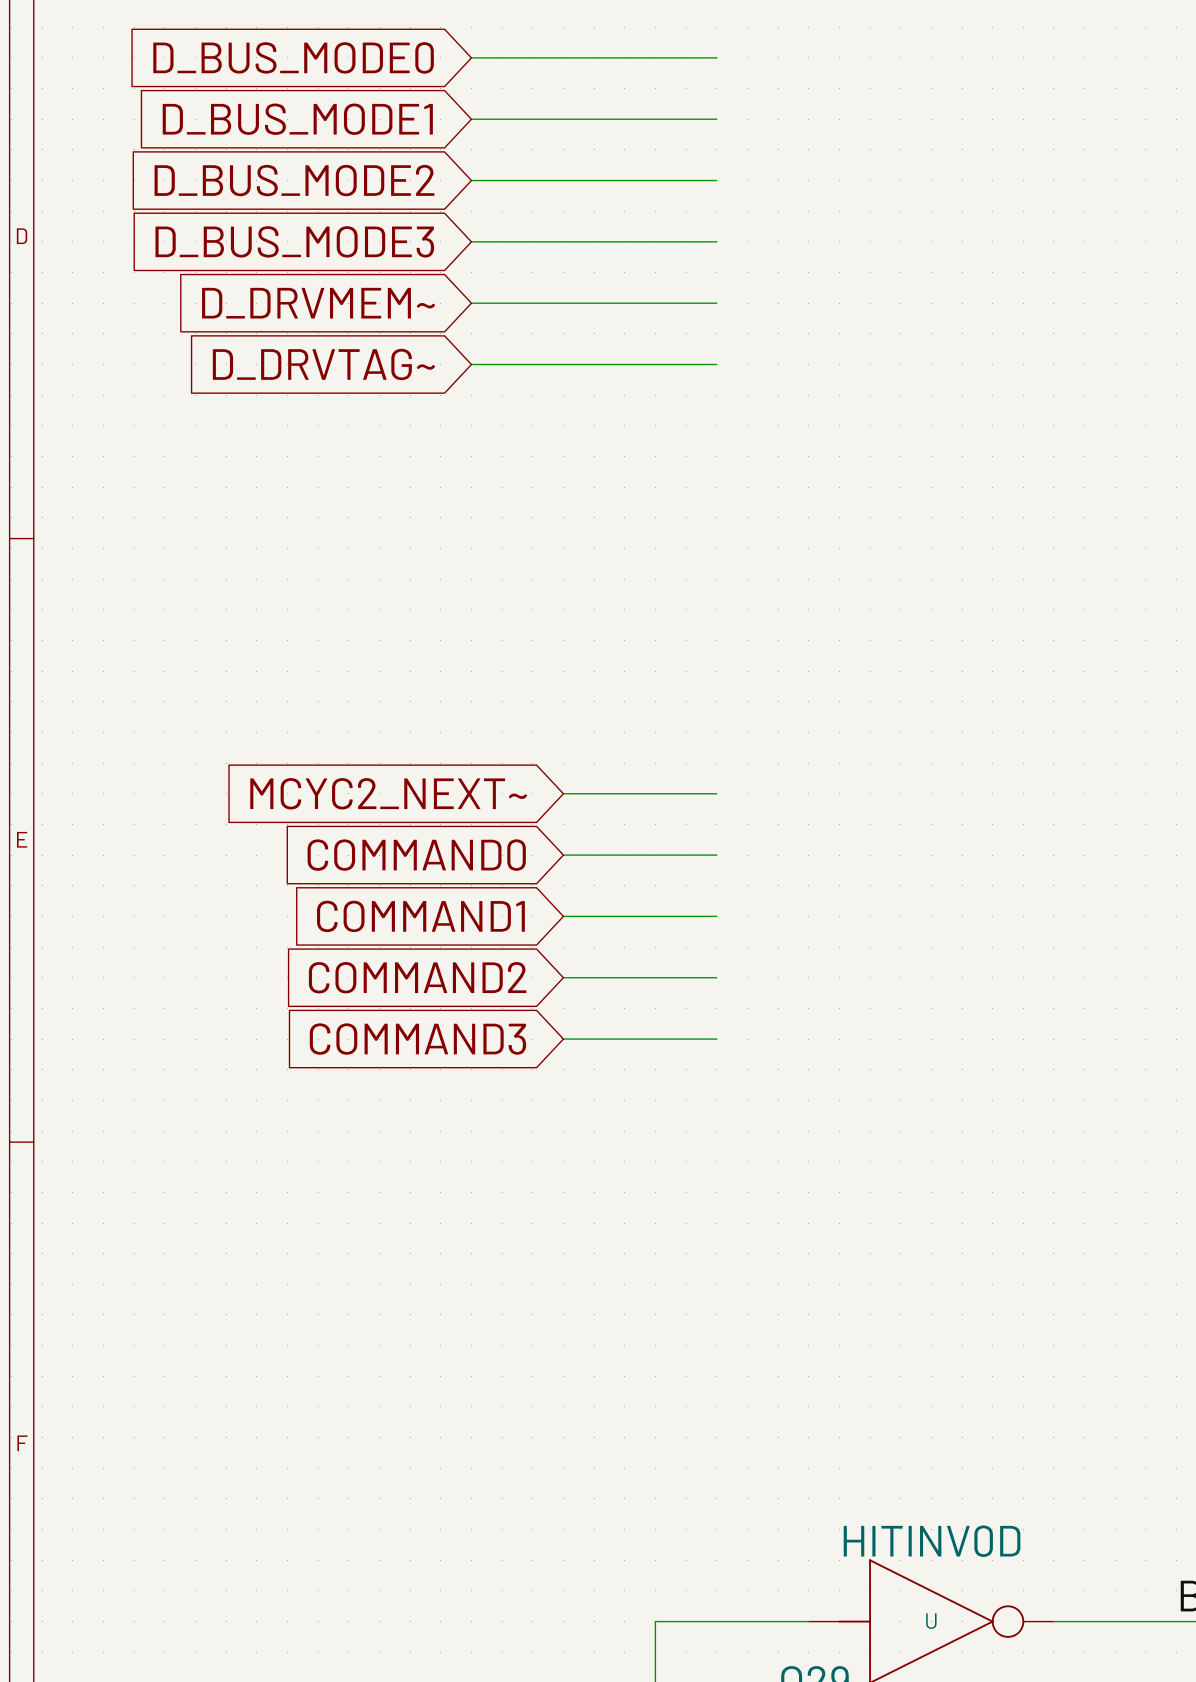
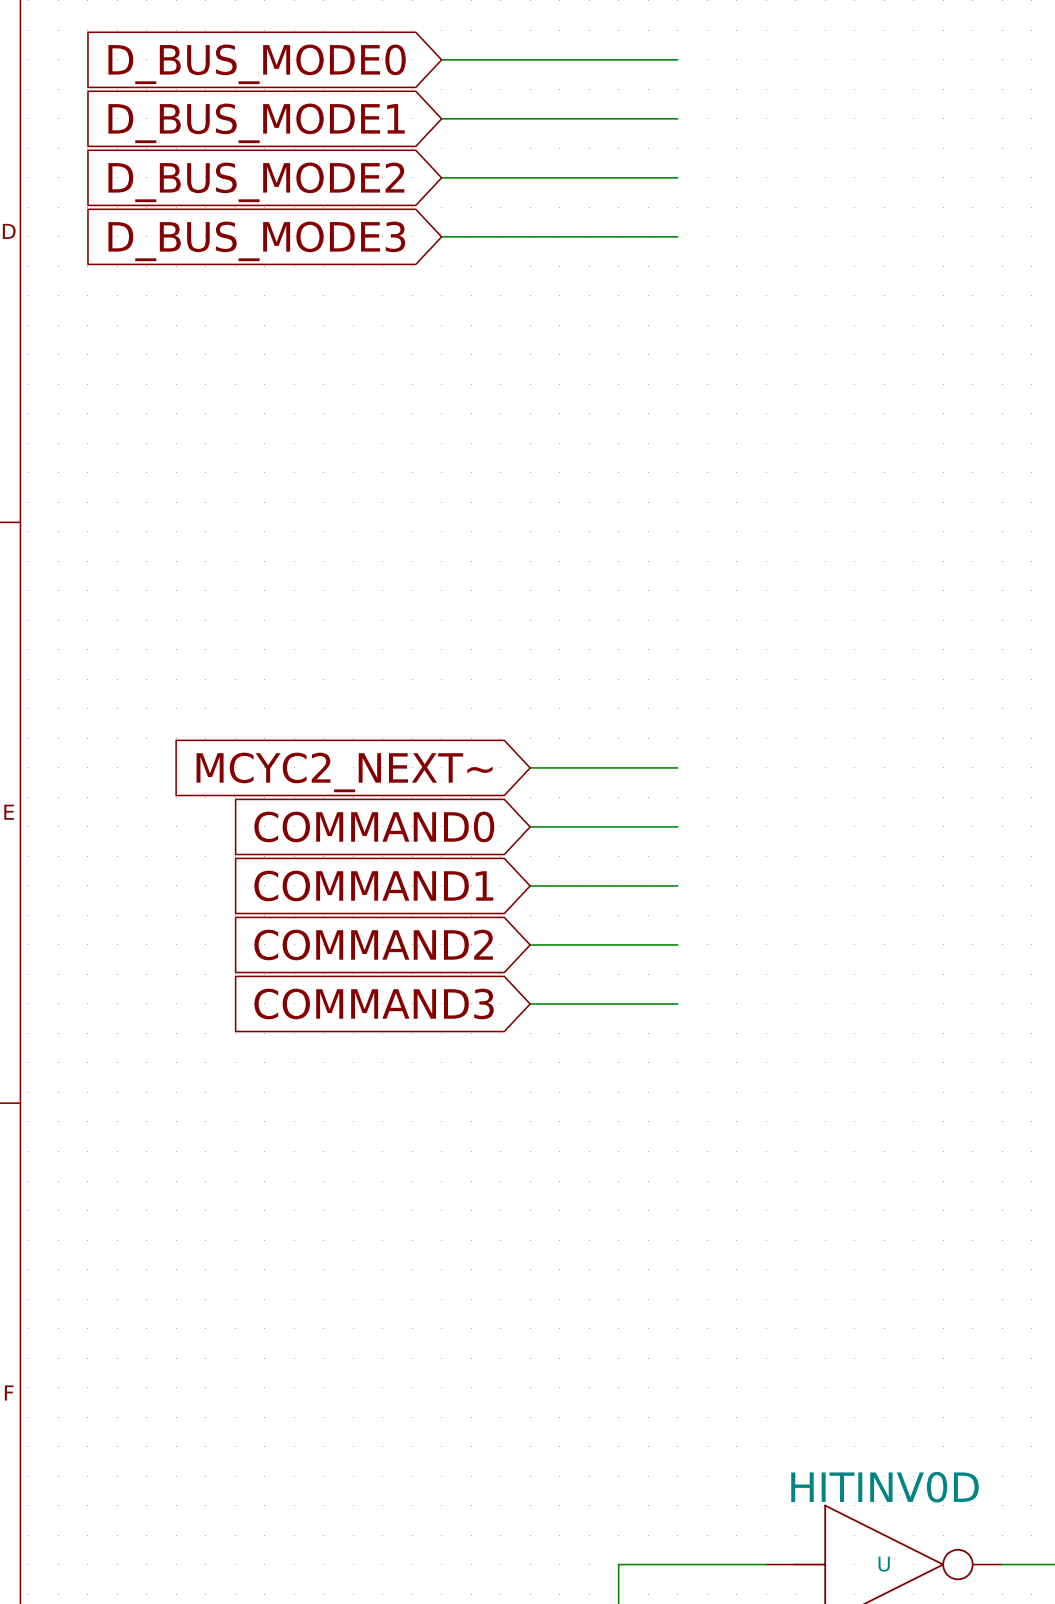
global label: D_DRVMEM~ (318, 303) -> none
wire: (471, 303) (716, 303) -> none
global label: D_DRVTAG~ (324, 364) -> none
wire: (471, 364) (716, 364) -> none

